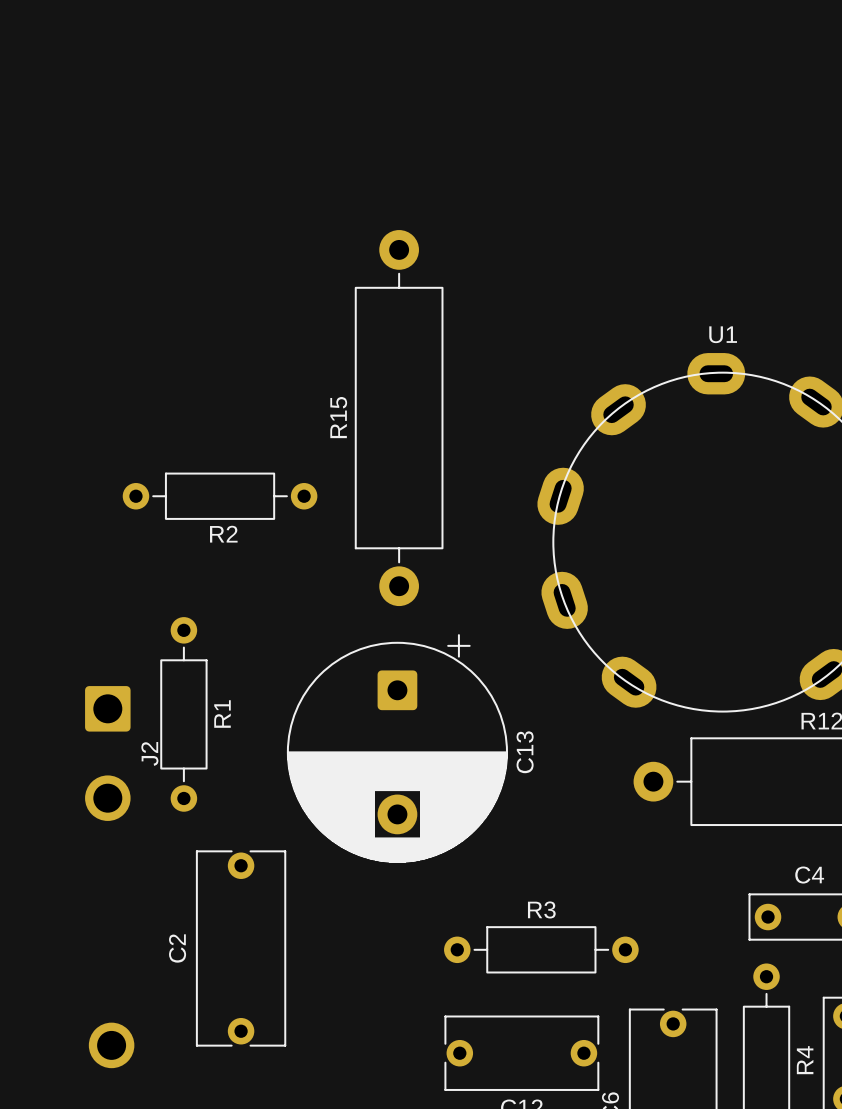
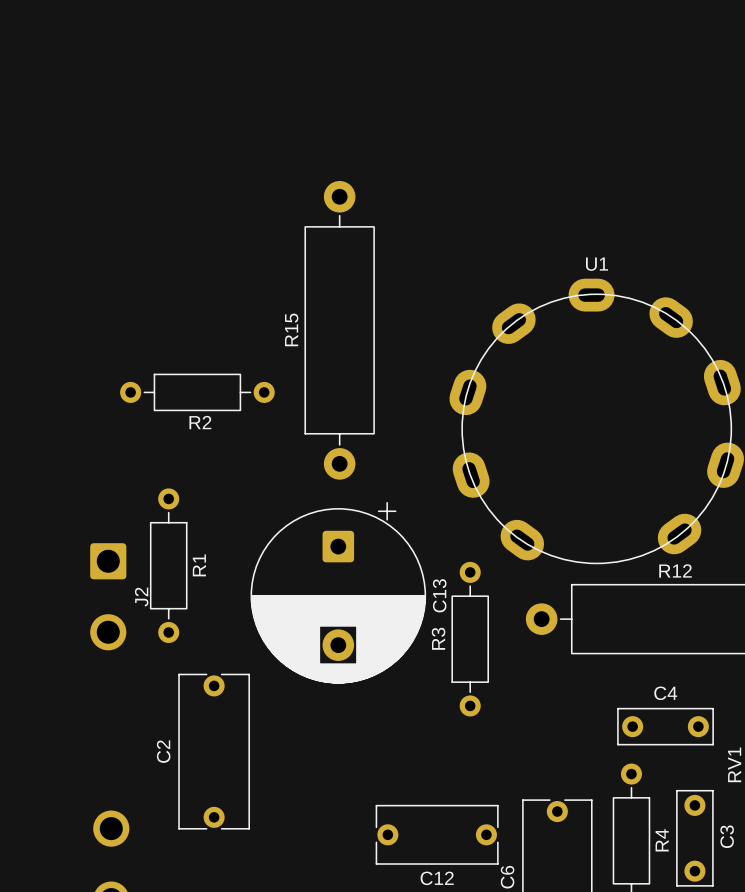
R3 name position: R3 (541, 909) -> R3 (438, 638)
R3 rotation: 0° (541, 949) -> 90° clockwise (470, 639)
R3 position: (541, 949) -> (470, 639)

